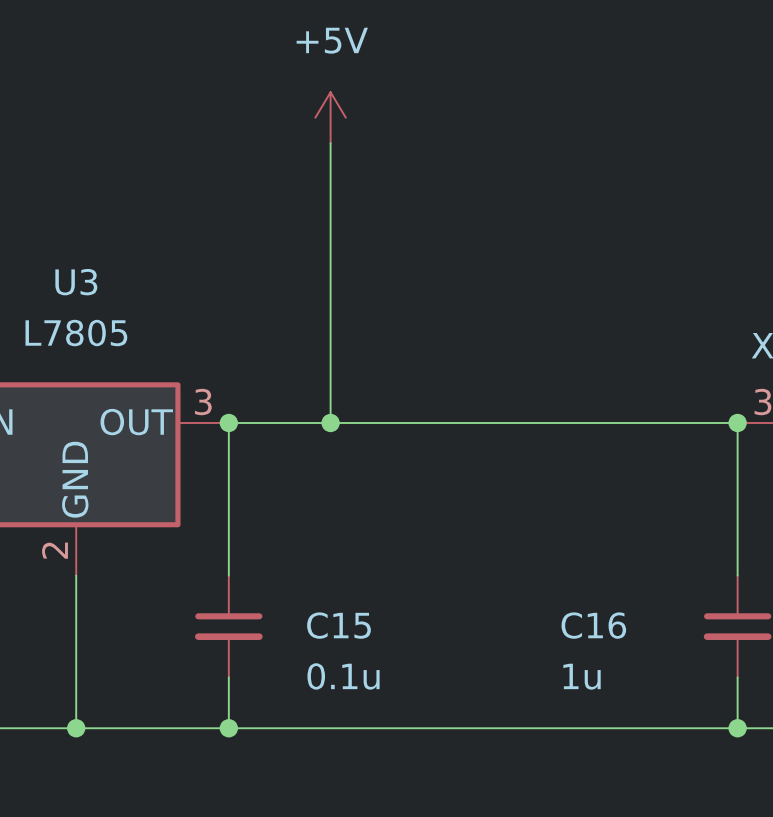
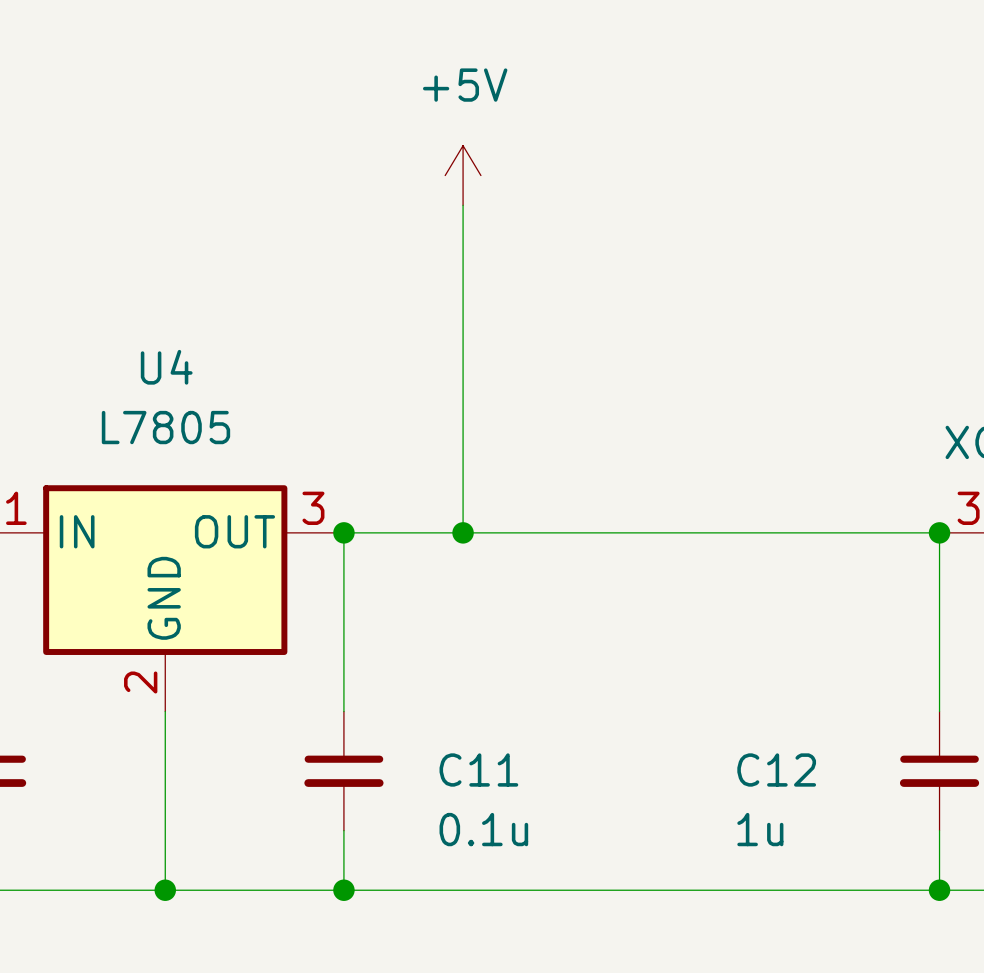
U3 name: U3 (76, 282) -> U4 (166, 367)
C15 name: C15 (338, 625) -> C11 (478, 770)
C16 name: C16 (593, 625) -> C12 (776, 770)

